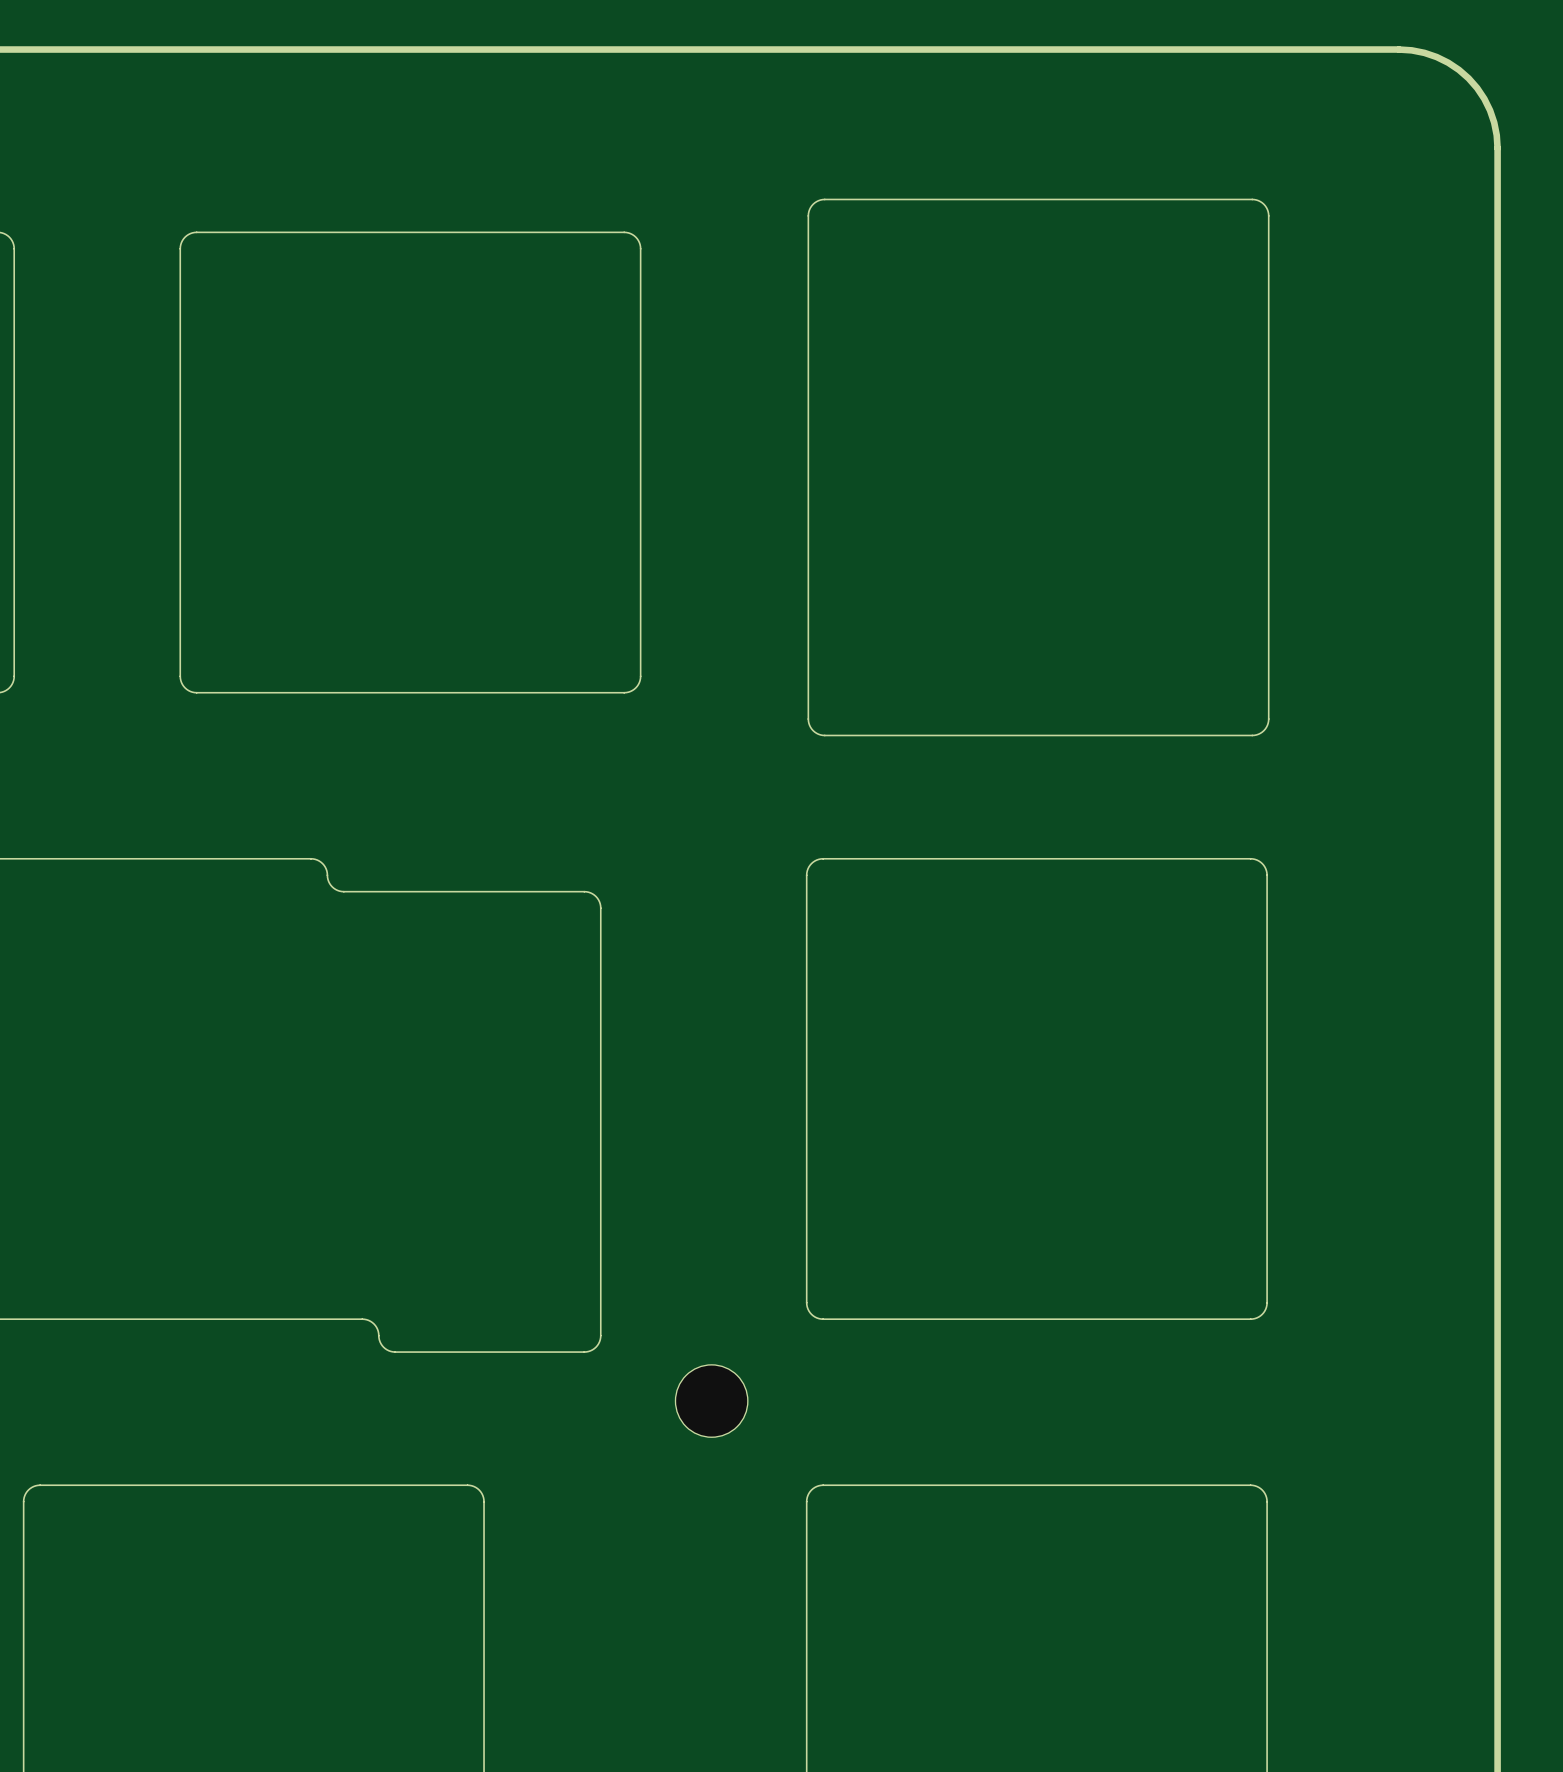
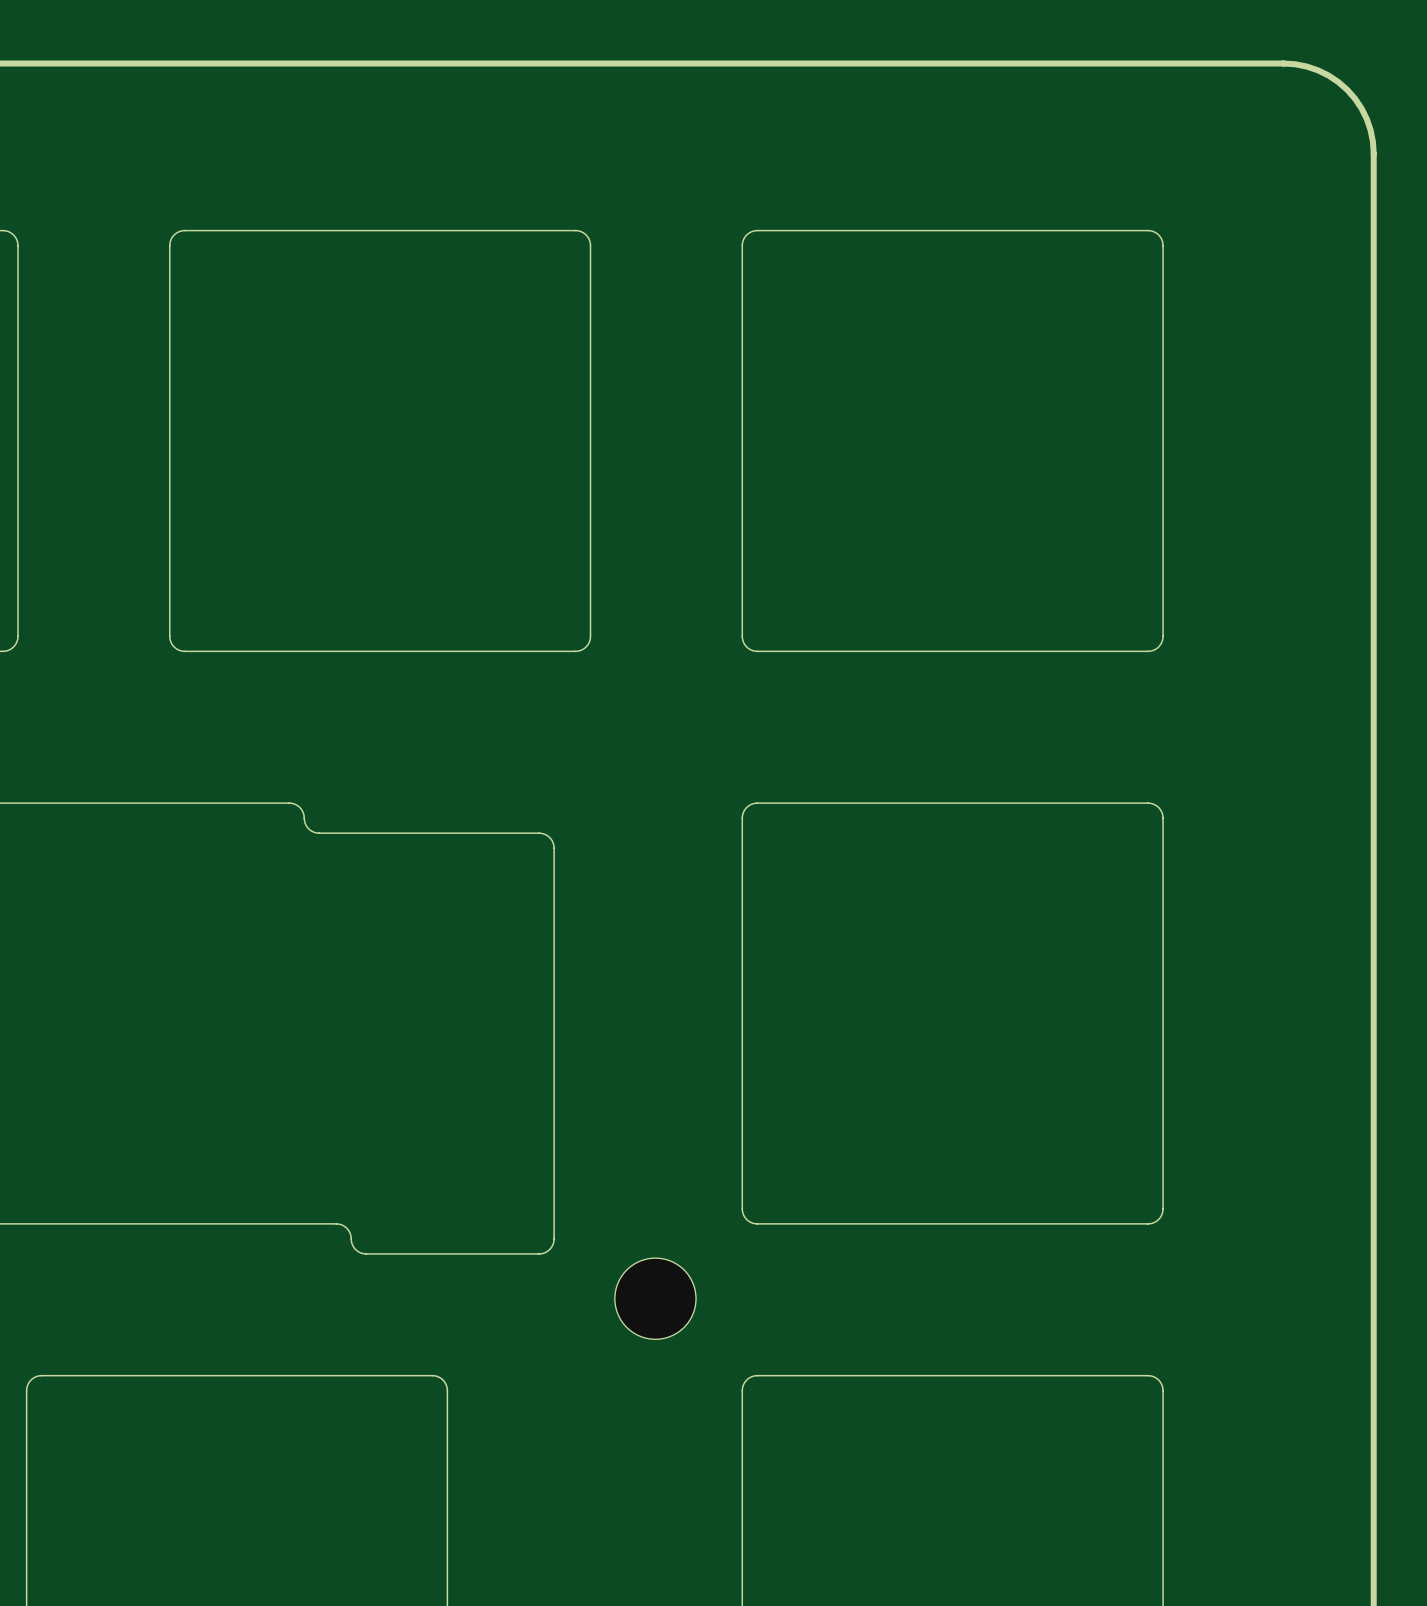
board edge: (824, 199) (1252, 199) (1260, 201) (1265, 205) (1268, 215) (1268, 719) (1266, 727) (1262, 732) (1252, 735) (824, 735) (816, 733) (811, 729) (808, 719) (808, 215) (813, 204) (824, 199) -> (757, 230) (746, 235) (742, 245) (742, 636) (746, 646) (757, 651) (1148, 651) (1158, 646) (1163, 636) (1163, 245) (1158, 235) (1148, 230) (757, 230)
part footprint: [675, 1364, 748, 1438] -> [614, 1258, 697, 1340]

